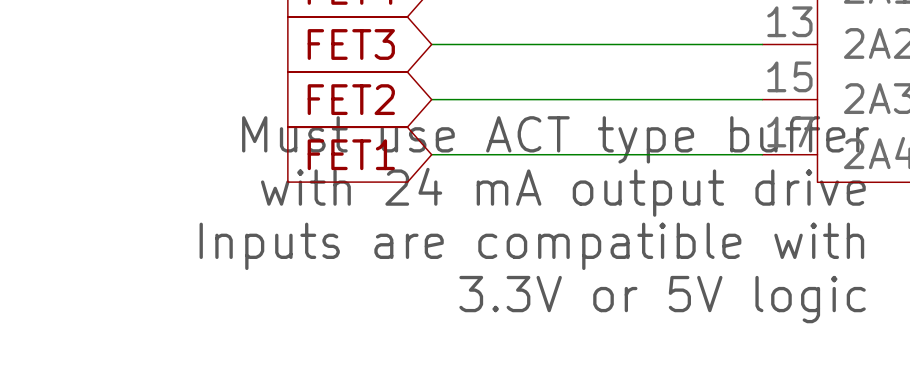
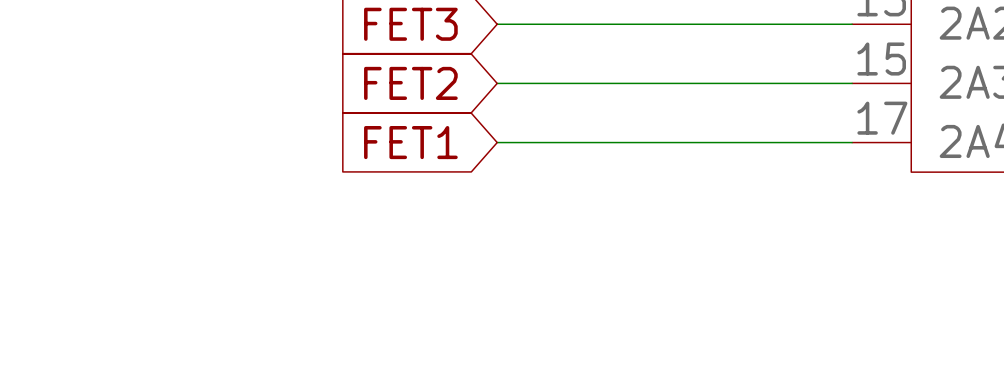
text: Must use ACT type buffer (555, 139) -> none
text: with 24 mA output drive (563, 192) -> none
text: Inputs are compatible with (531, 246) -> none
text: 3.3V or 5V logic (662, 299) -> none

